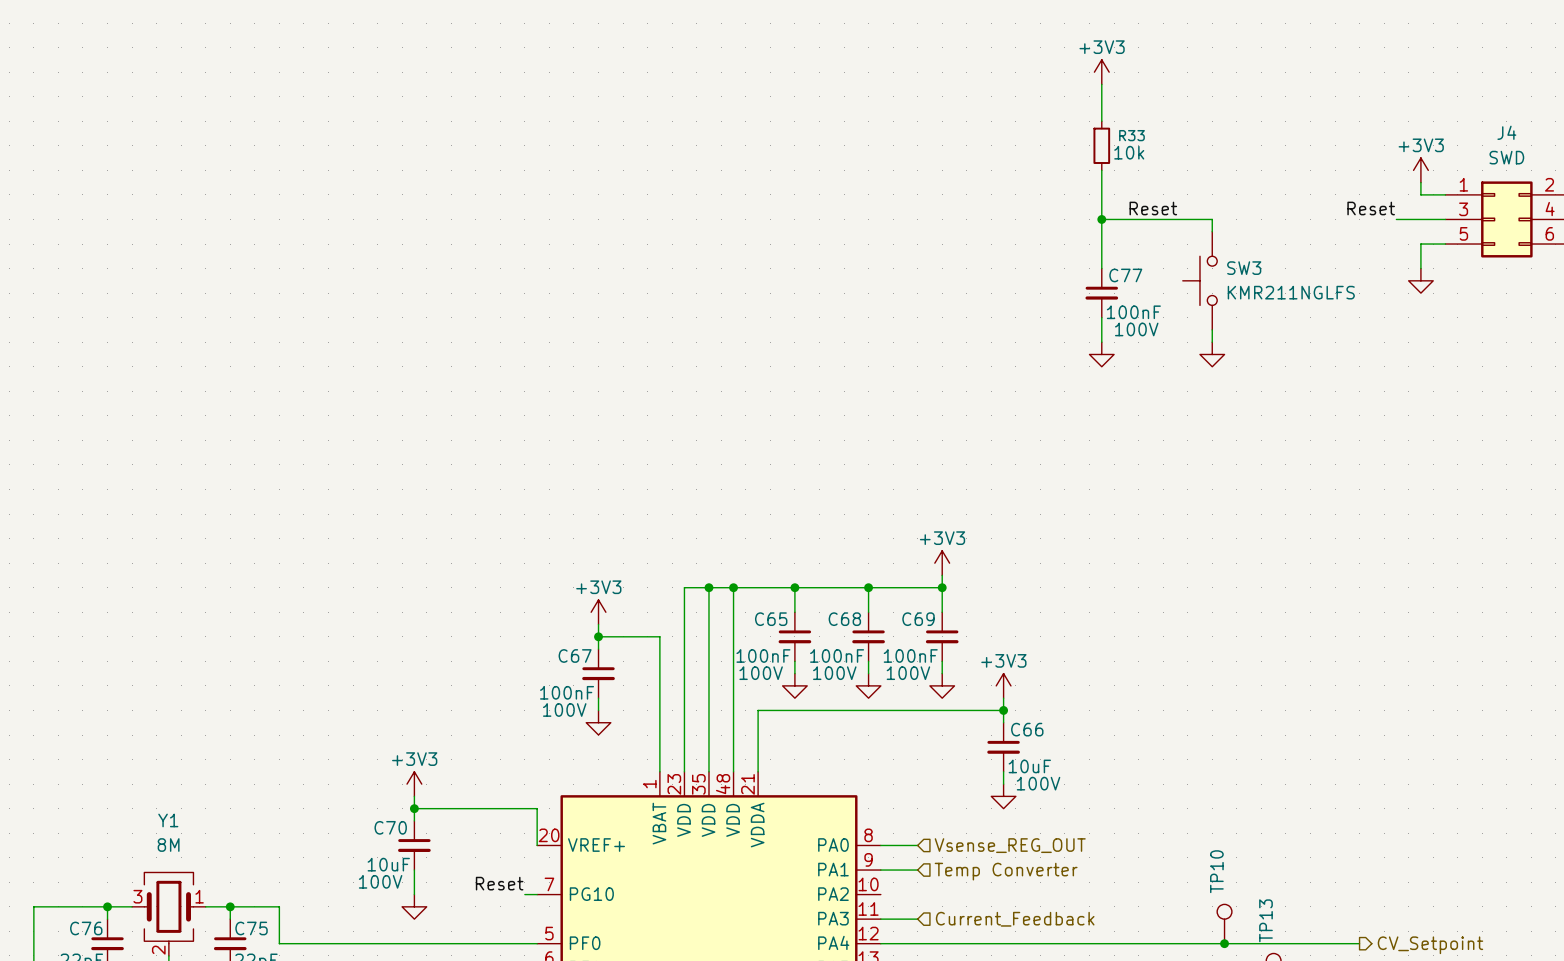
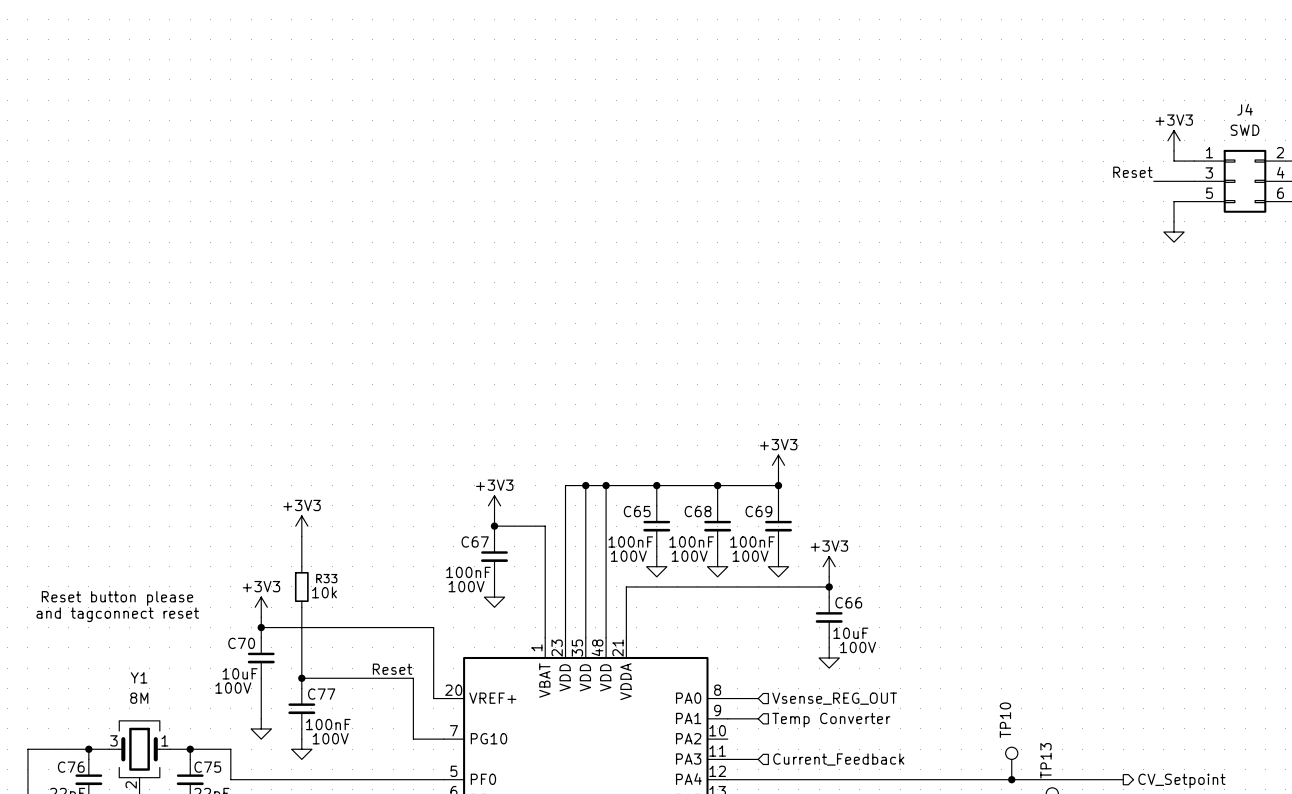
power symbol: +3V3 (1101, 72) -> none
wire: (1101, 84) (1101, 121) -> none
R33 position: (1101, 145) -> (301, 586)
wire: (1101, 170) (1101, 268) -> none
label: Reset (1153, 208) -> none
wire: (1101, 219) (1212, 219) (1212, 231) -> none
junction: (1101, 219) -> none
SW3: KMR211NGLFS (1199, 280) -> none
C77 position: (1101, 293) -> (301, 708)
wire: (1101, 317) (1101, 342) -> none
wire: (1212, 329) (1212, 342) -> none
power symbol: (1101, 354) -> none
power symbol: (1212, 354) -> none
power symbol: none -> +3V3 (301, 526)
wire: none -> (301, 536) (301, 566)
text: none -> Reset button please (117, 598)
power symbol: none -> +3V3 (261, 607)
wire: none -> (301, 607) (301, 688)
text: none -> and tagconnect reset (117, 614)
junction: none -> (261, 627)
power symbol: +3V3 (414, 784) -> none
wire: (414, 796) (414, 820) -> (261, 617) (261, 637)
wire: (414, 808) (537, 808) (537, 845) -> (261, 627) (433, 627) (433, 698) (443, 698)
junction position: (414, 808) -> (301, 678)
wire: none -> (261, 678) (261, 718)
wire: none -> (301, 678) (413, 678) (413, 739) (433, 739)
C70 position: (414, 845) -> (261, 657)
wire: (414, 870) (414, 894) -> none
power symbol: none -> (261, 728)
wire: none -> (301, 728) (301, 739)
label position: Reset (499, 883) -> Reset (392, 669)
power symbol position: (414, 906) -> (301, 749)

